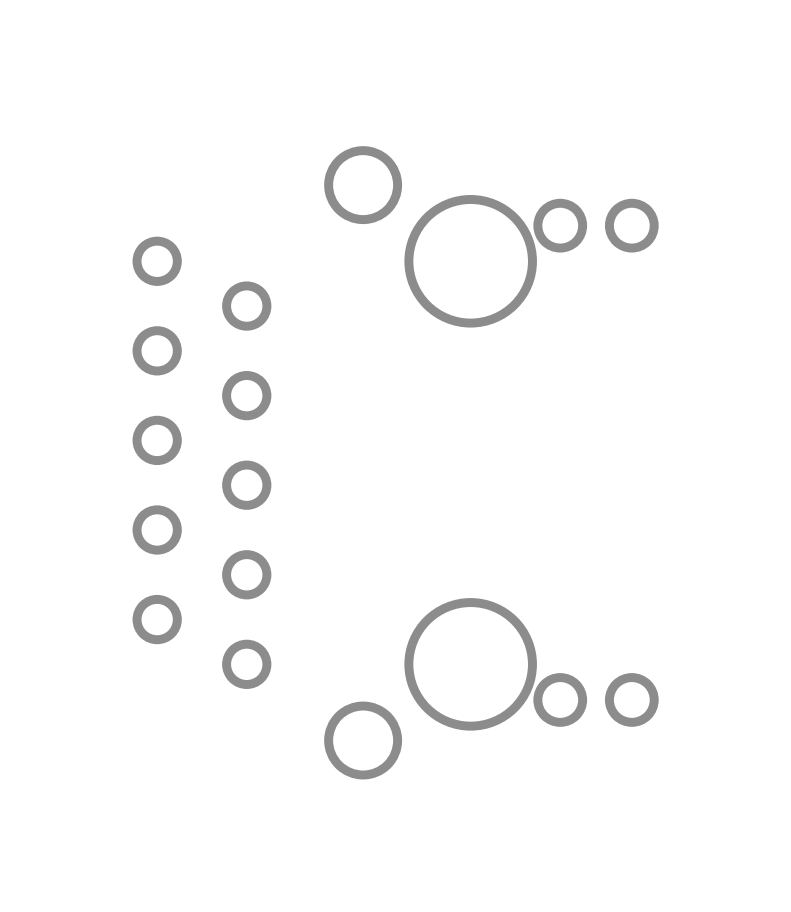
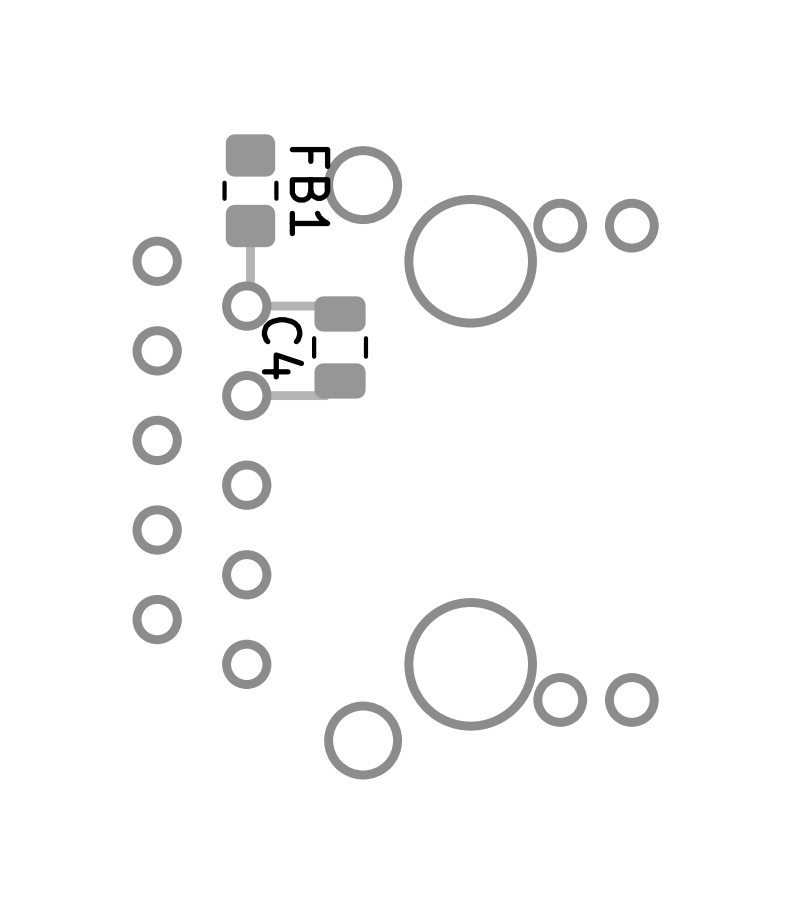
FB1: none -> (250, 190)
track: none -> (250, 225) (250, 302) (246, 306) (332, 306) (340, 313)
C4: none -> (340, 347)
track: none -> (340, 380) (325, 395) (246, 395)

